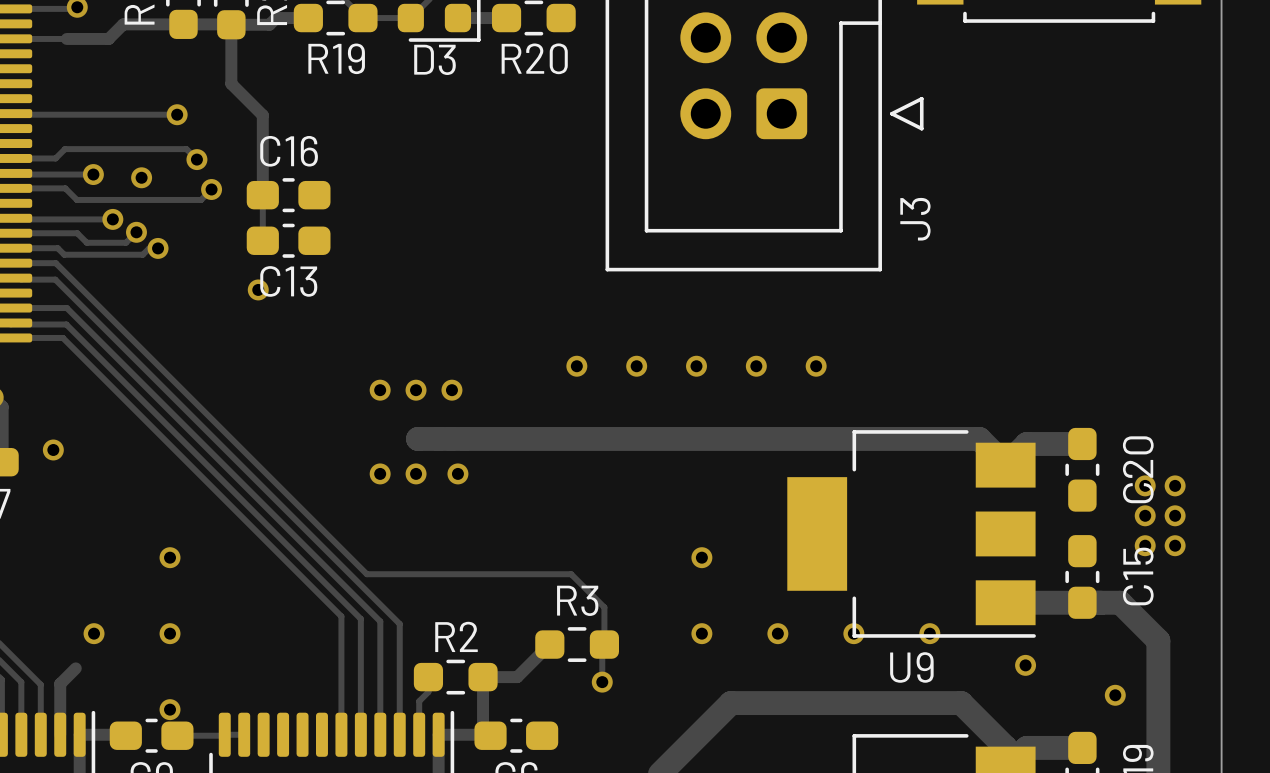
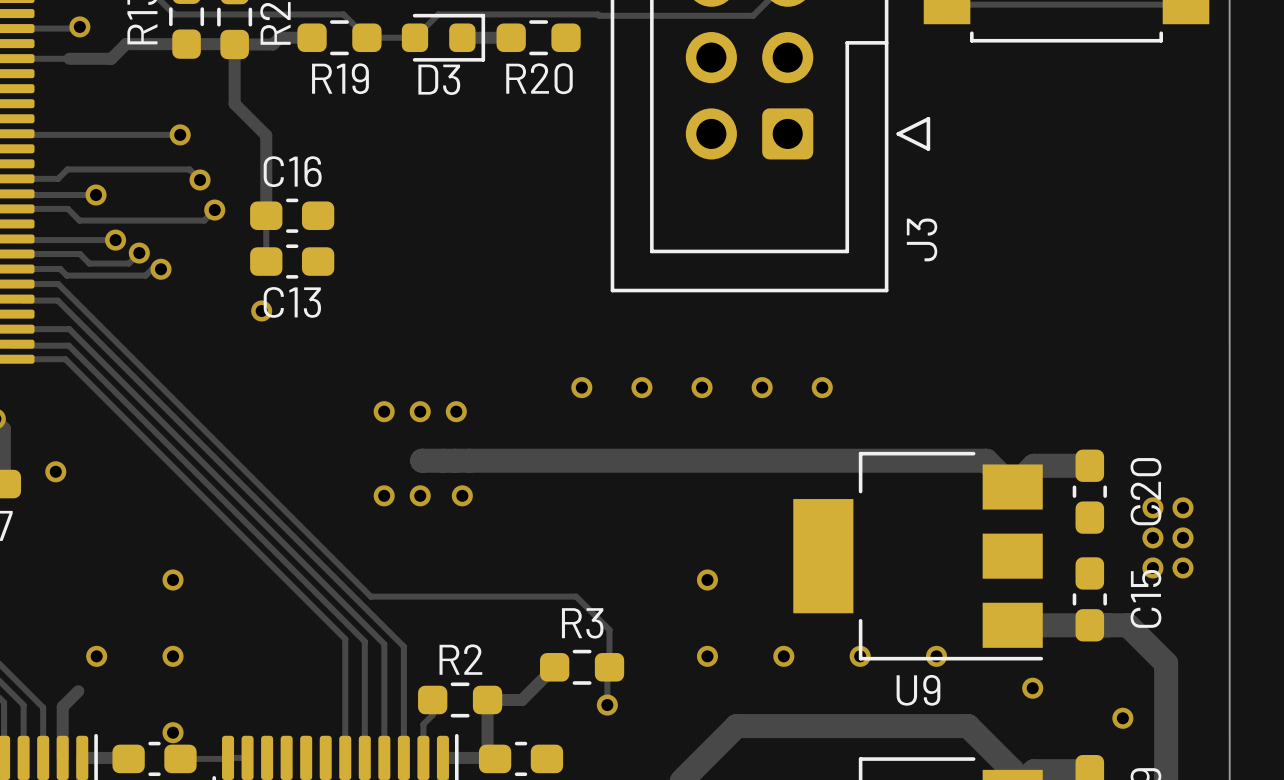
via: (141, 177) -> none

